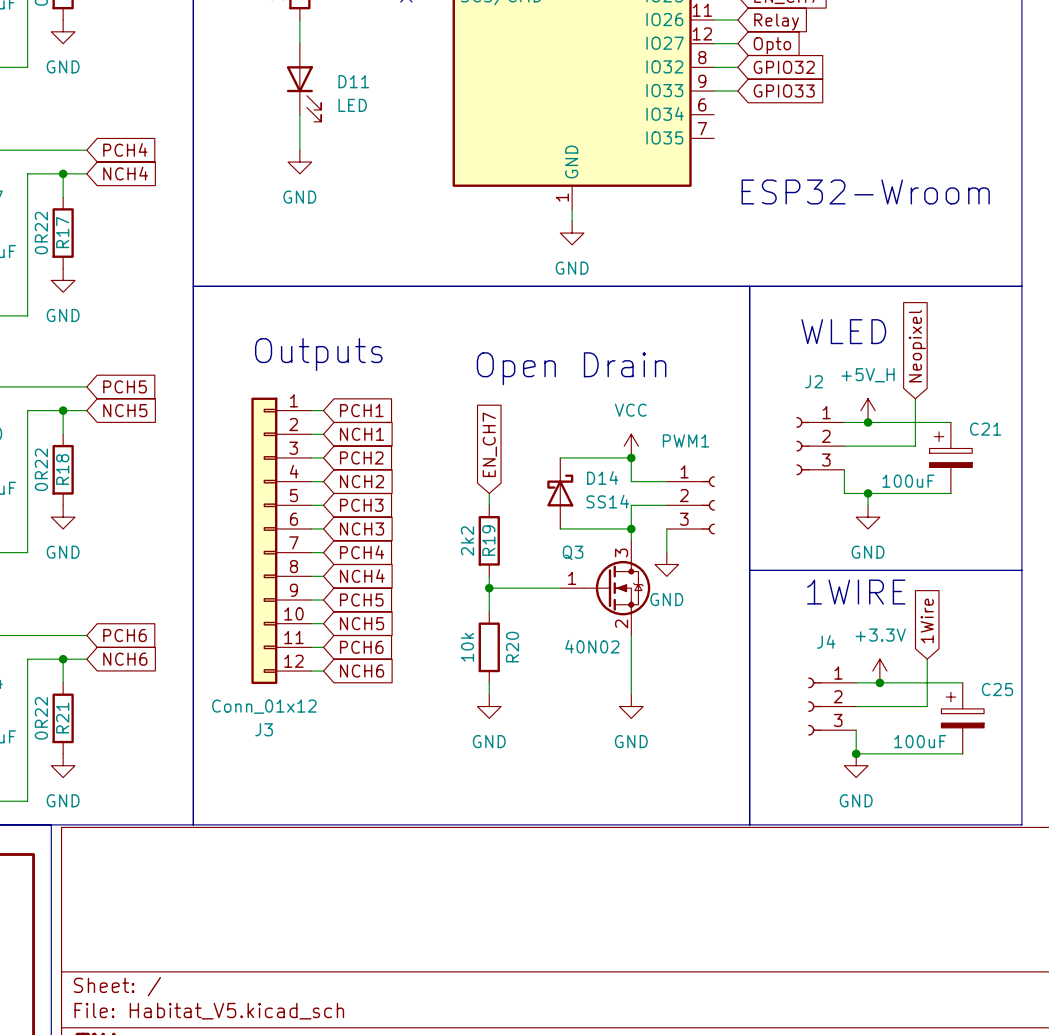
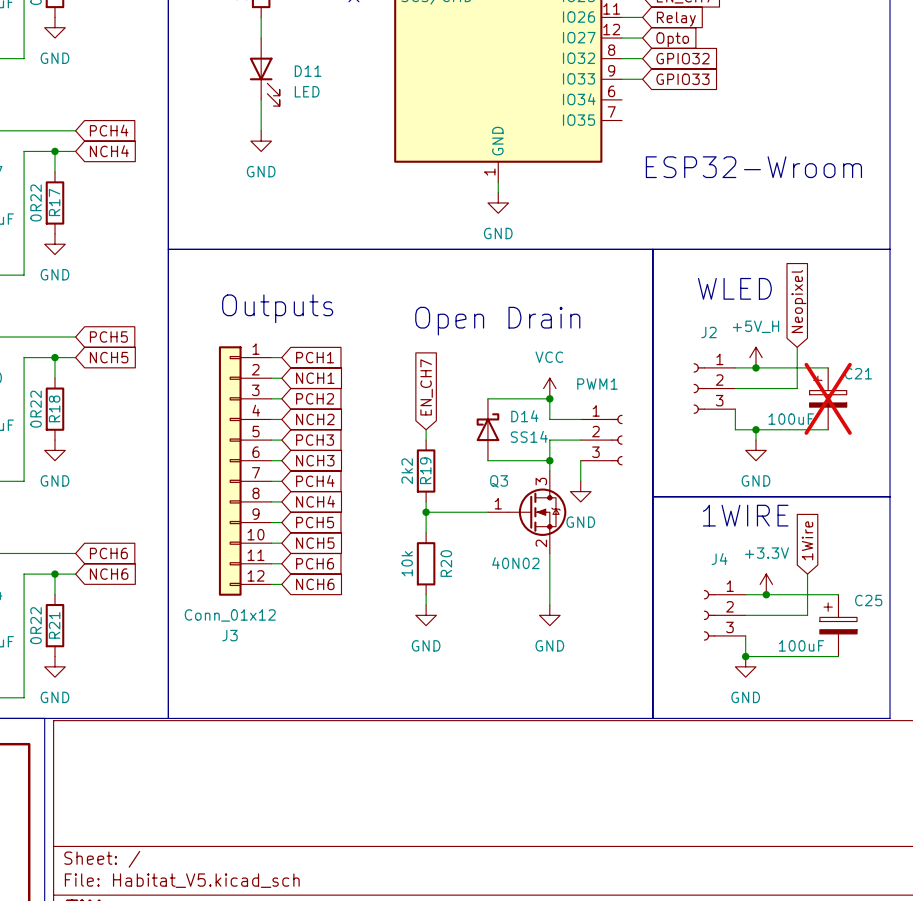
C21 do-not-place cross: none -> (828, 398)

